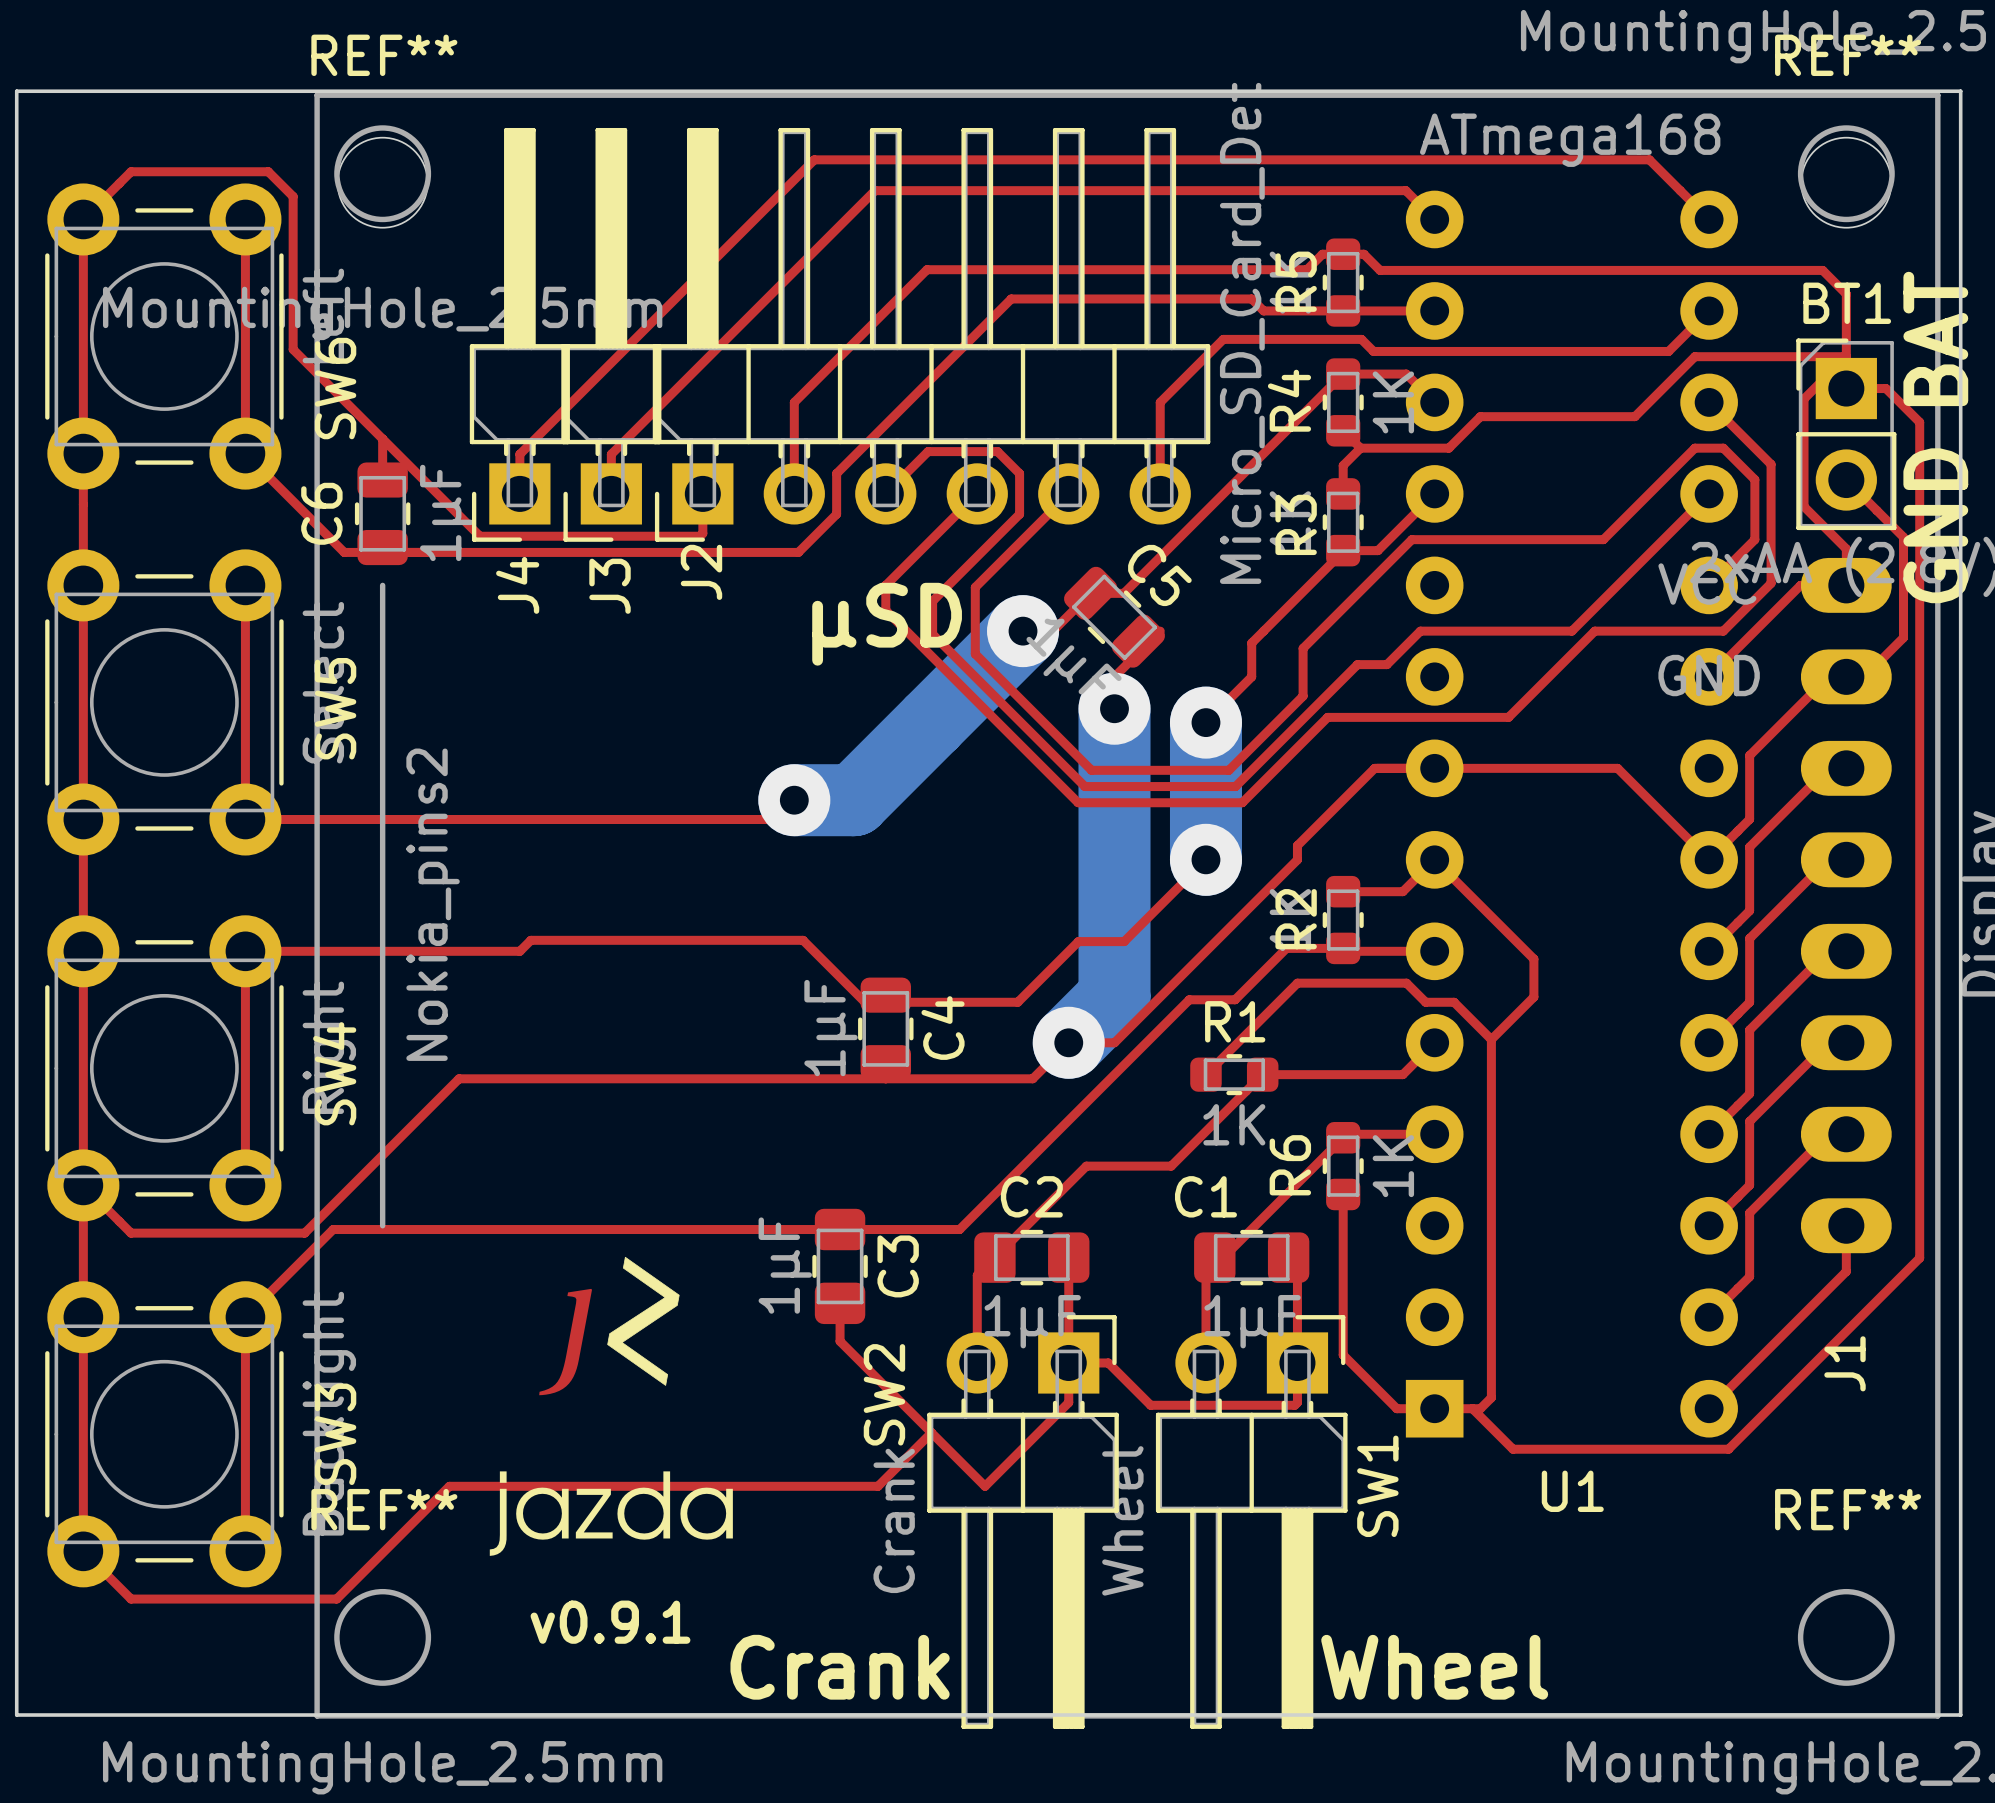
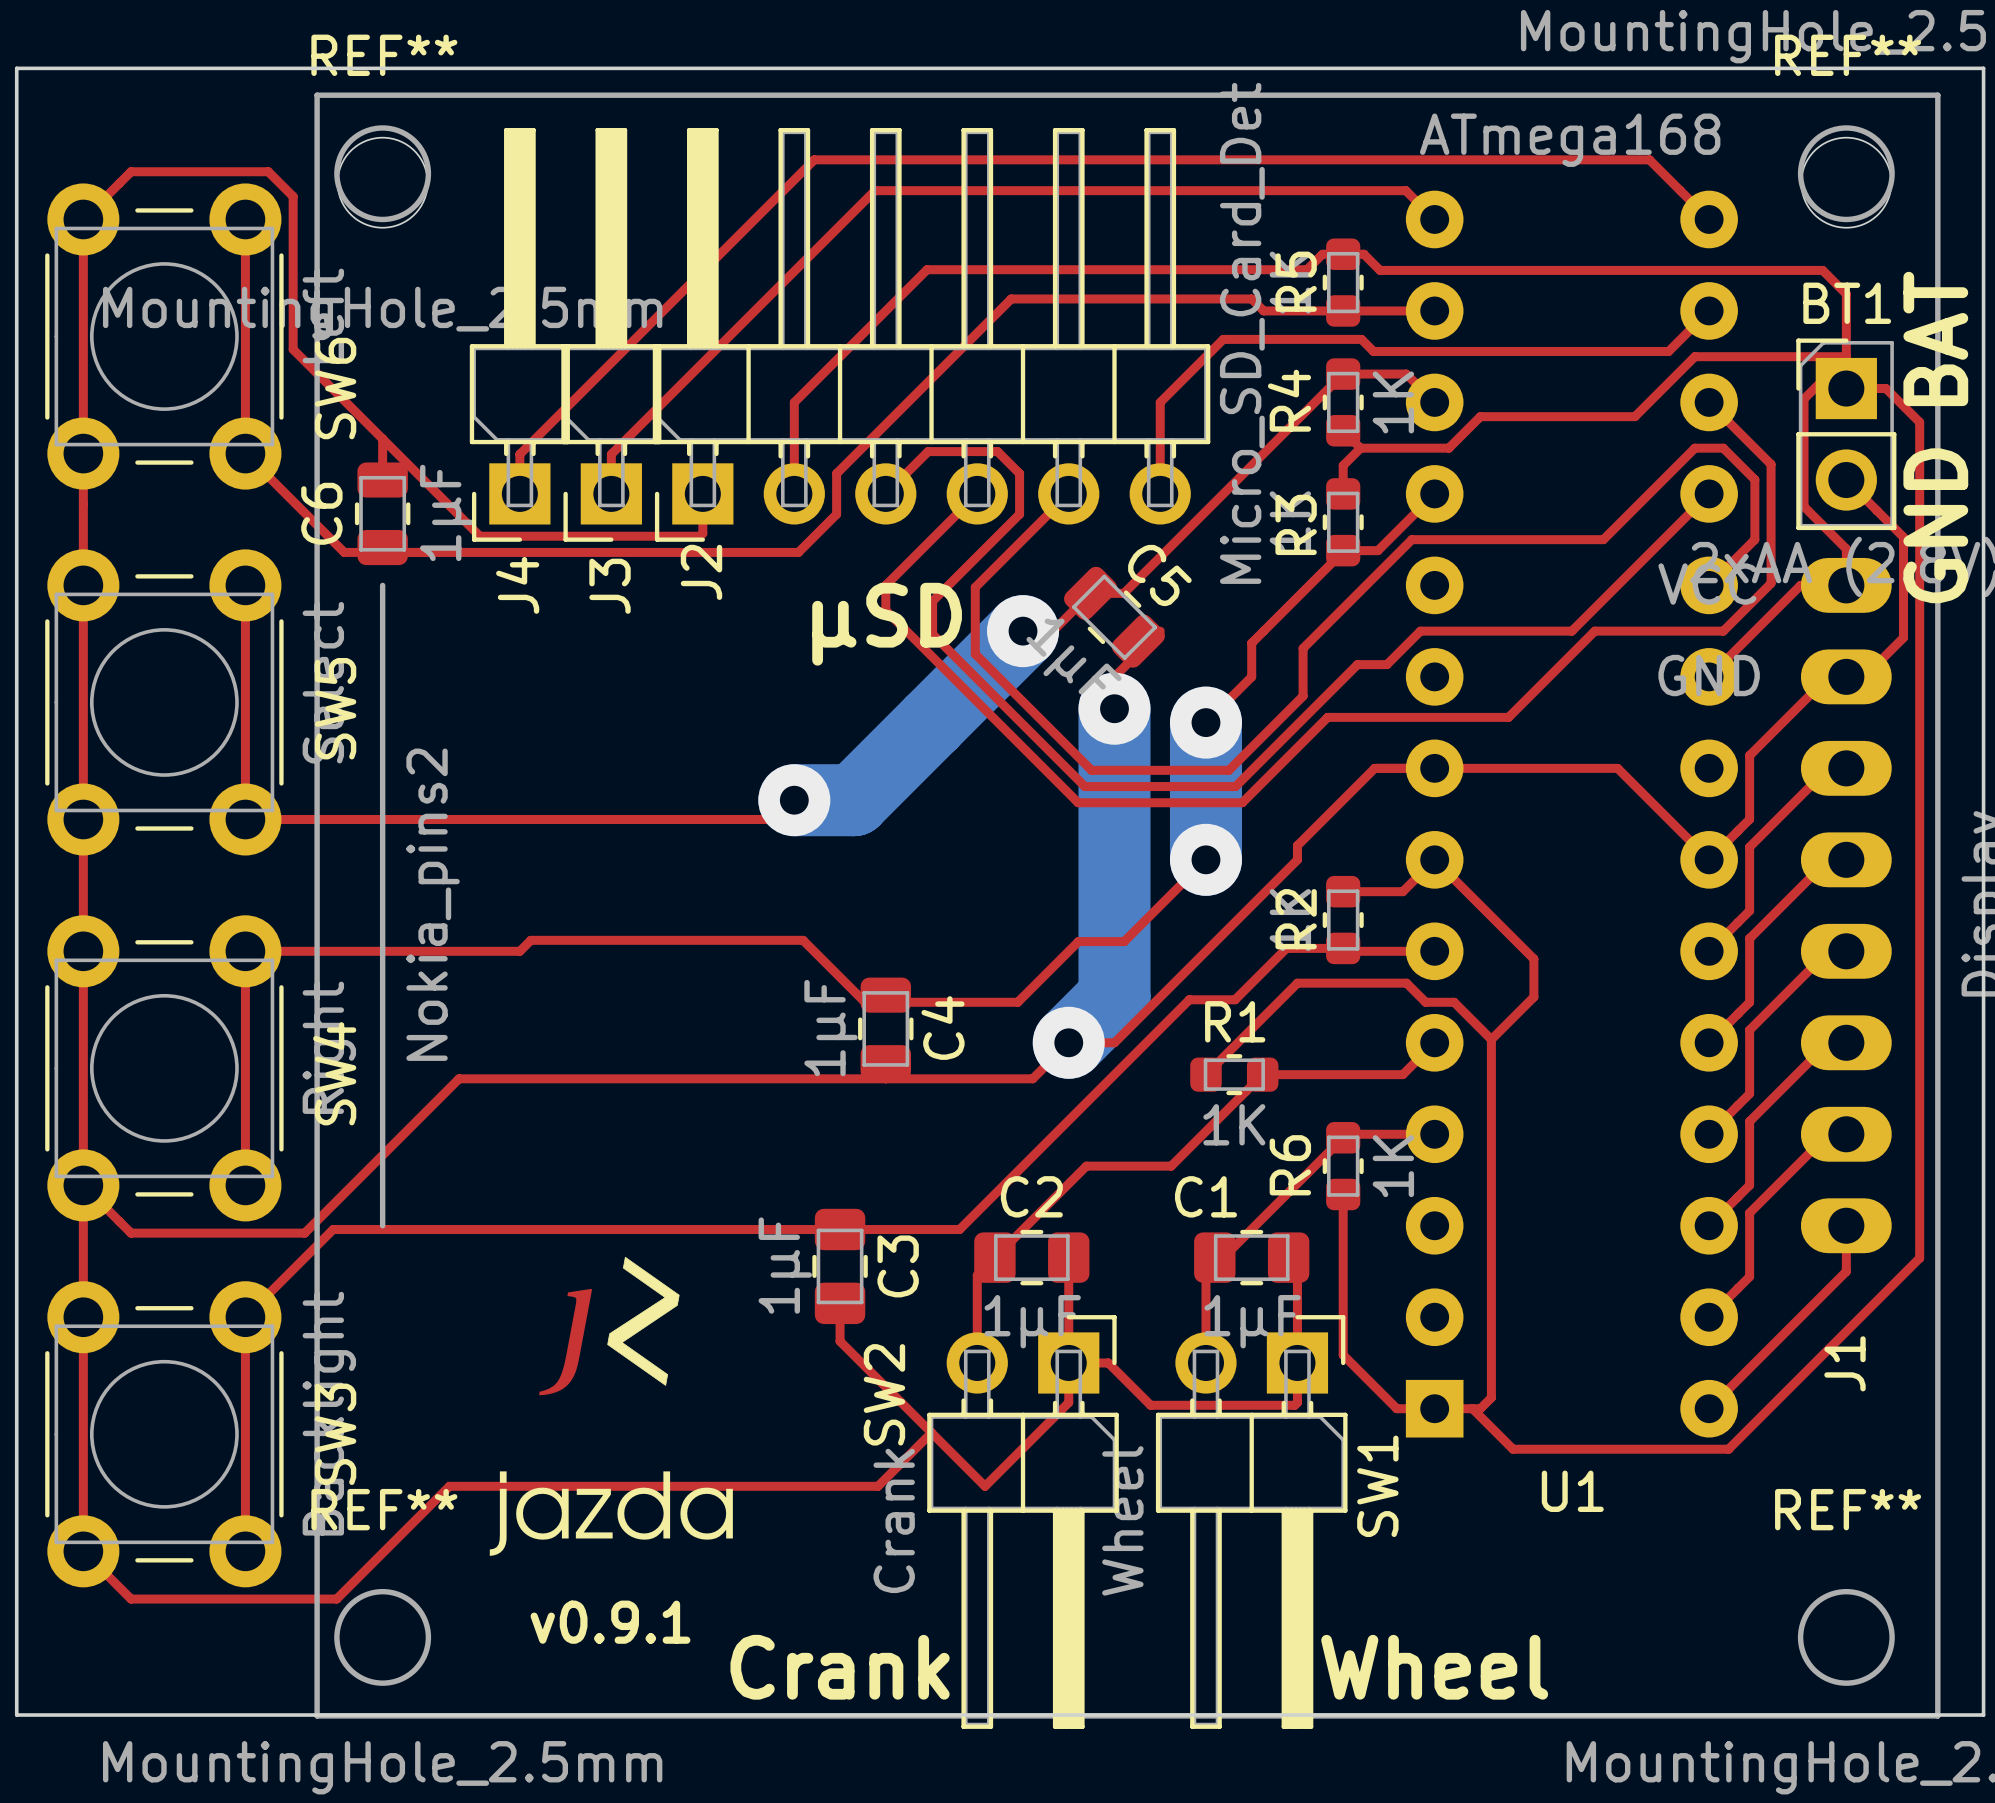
board edge: (16, 91) (1960, 91) (1960, 1715) -> (16, 91) (16, 68) (1983, 68) (1983, 1715) (1960, 1715)

